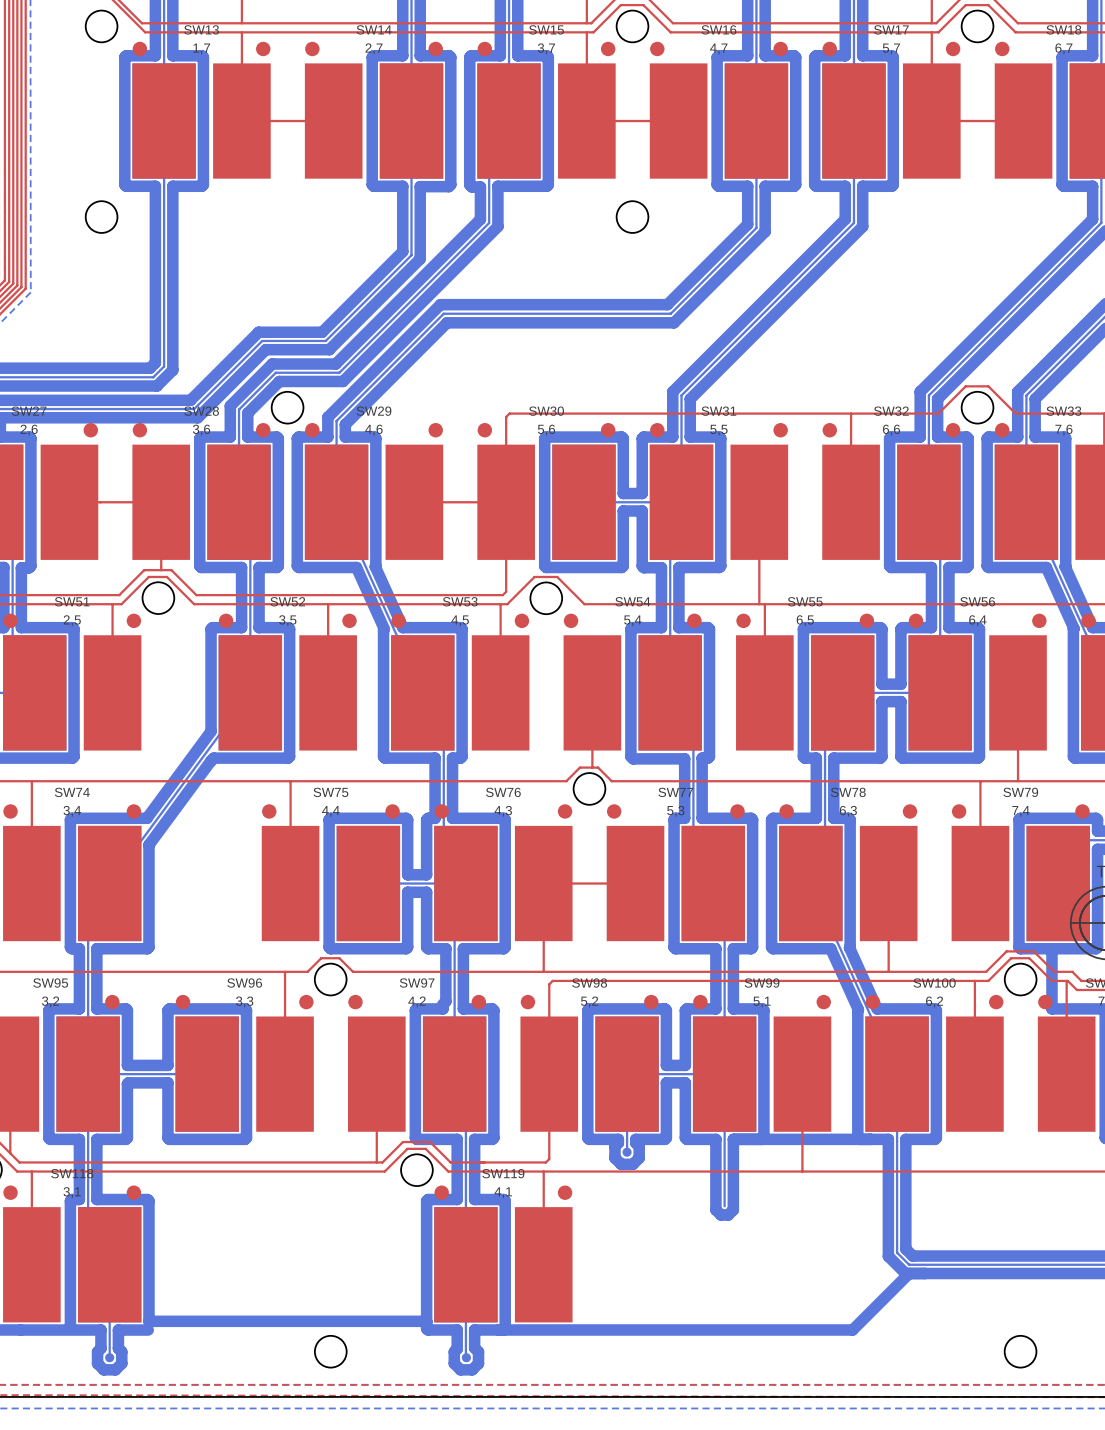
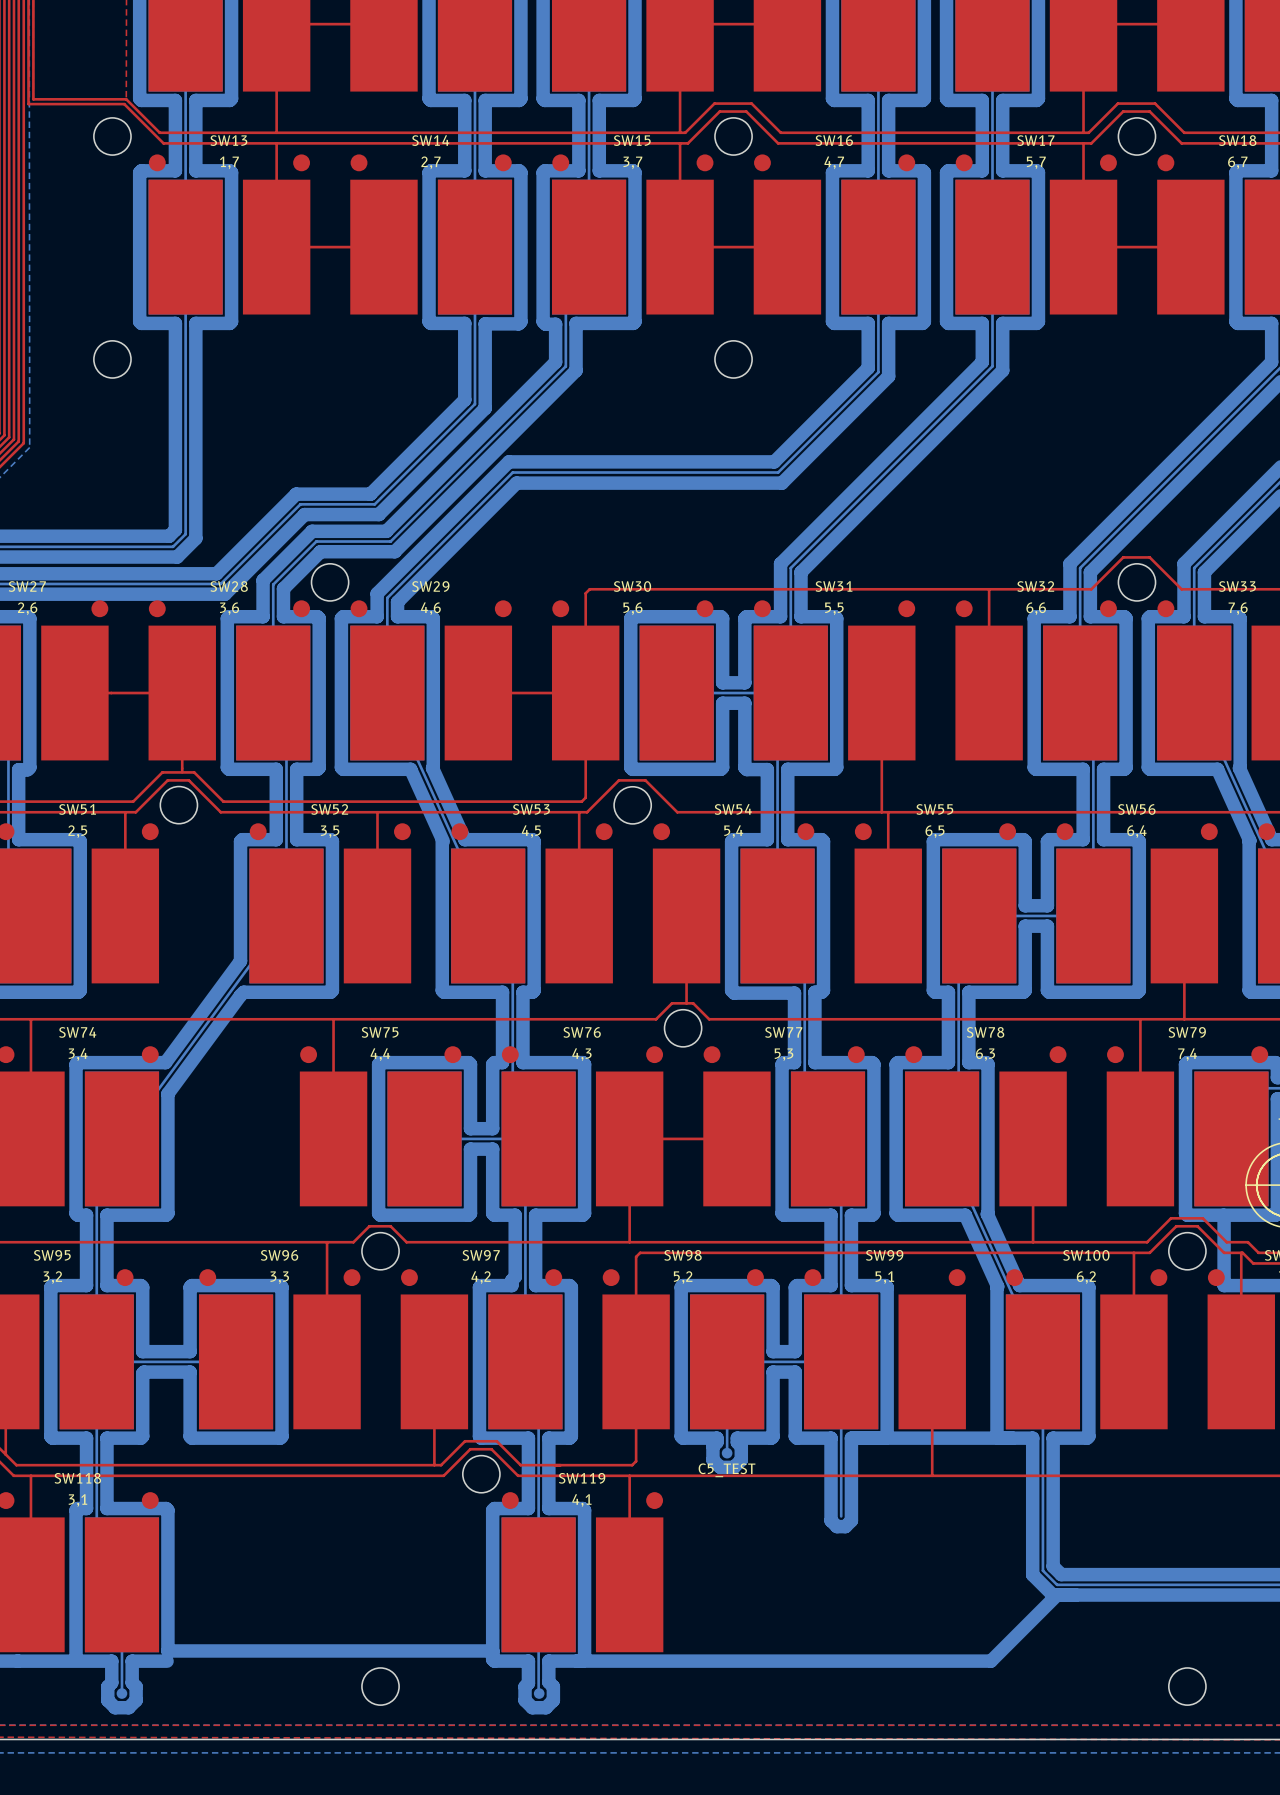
C5_TEST name: none -> C5_TEST (727, 1470)

